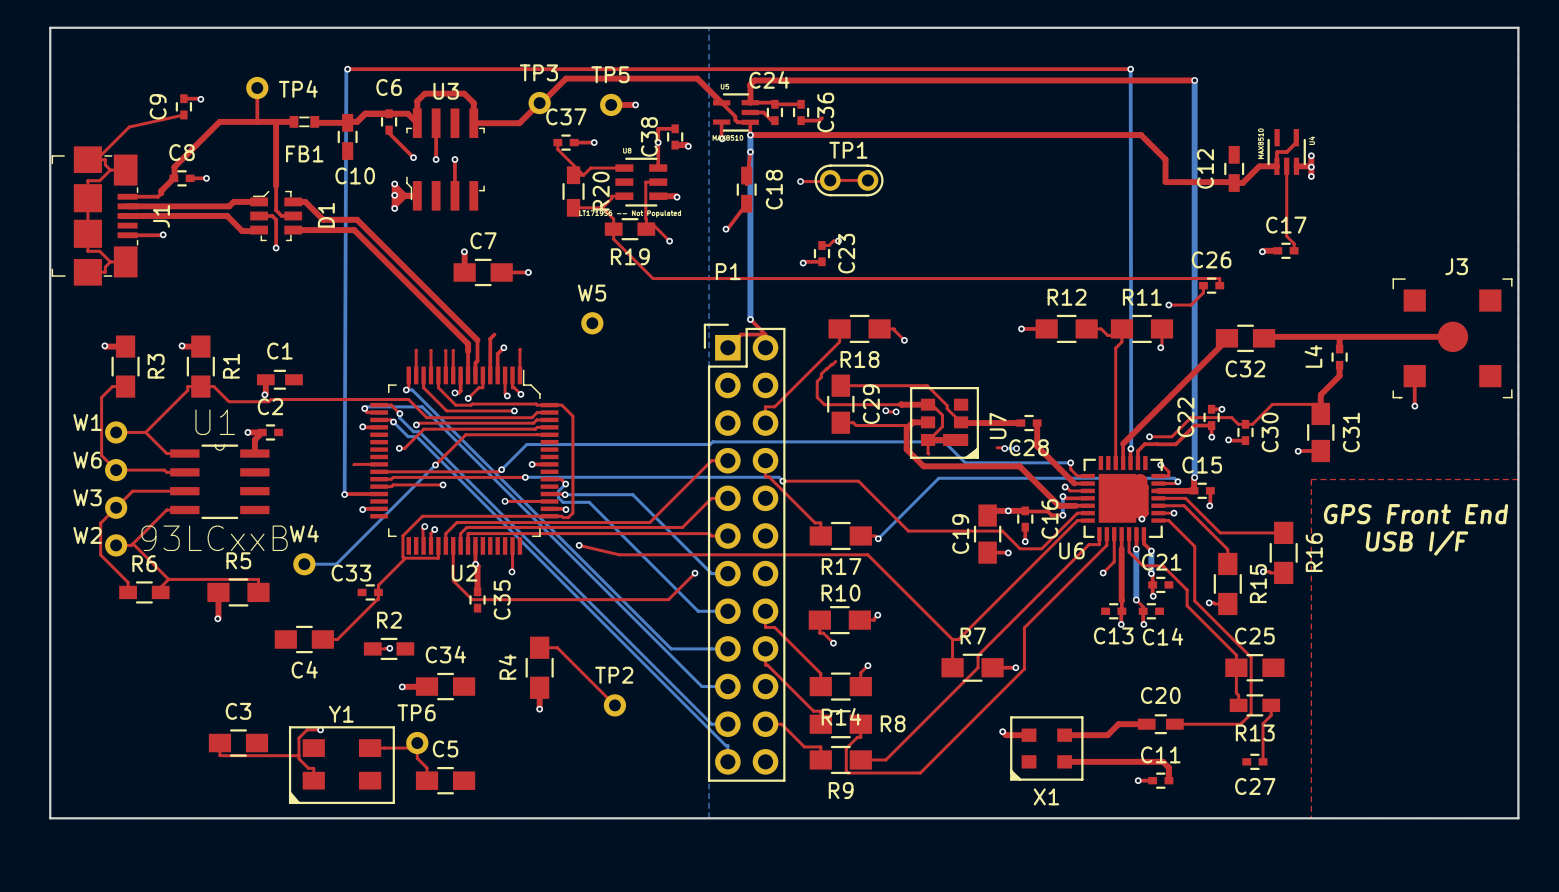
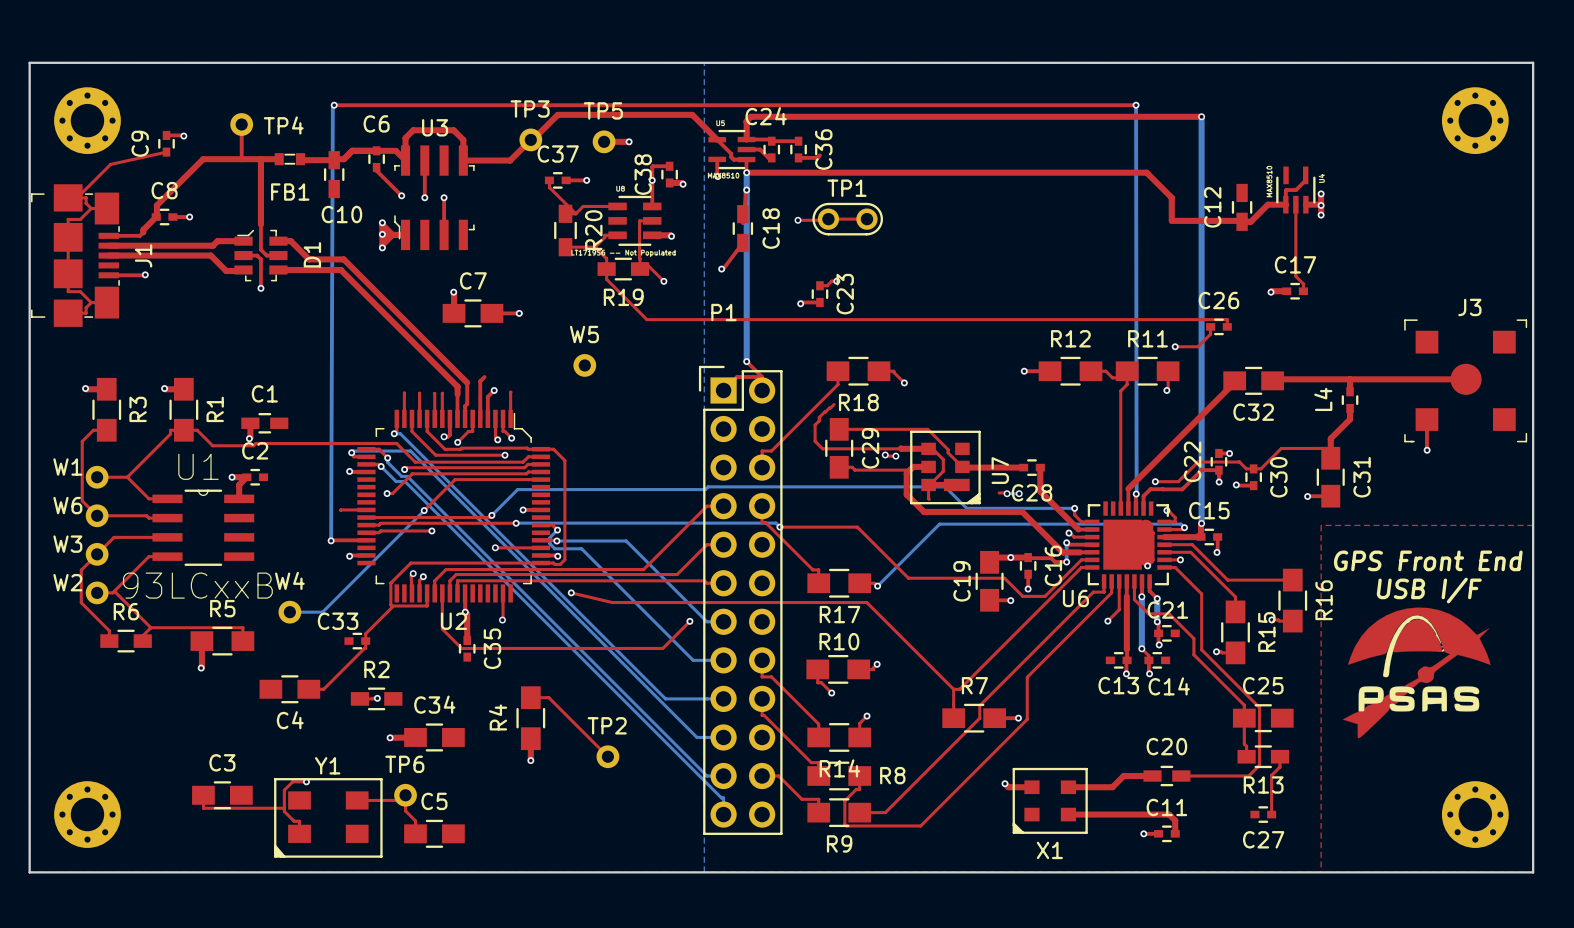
part: none -> (87, 120)
part: none -> (1475, 120)
drawing: none -> [1342, 607, 1491, 739]
part: none -> (87, 814)
part: none -> (1475, 814)

